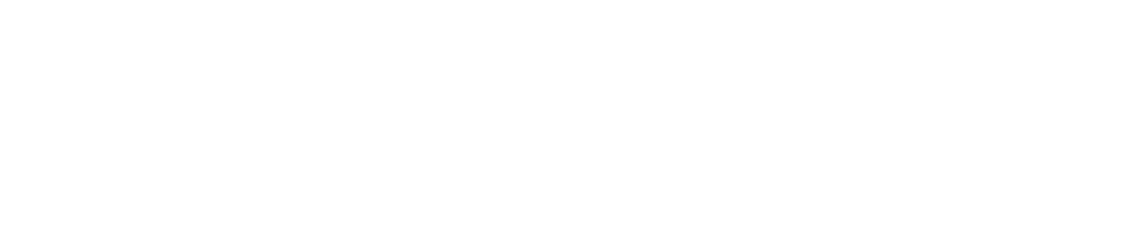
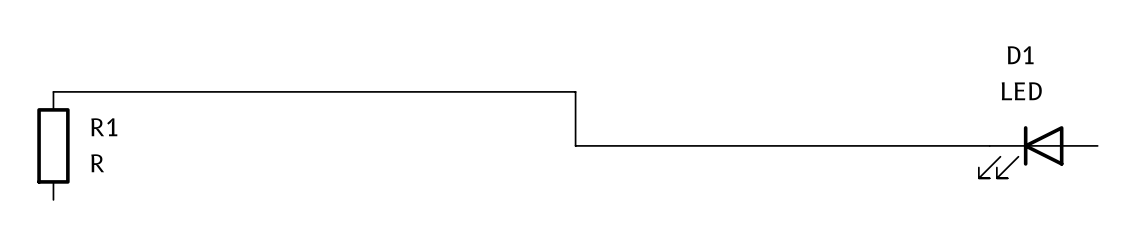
wire: none -> (53, 91) (575, 91) (575, 145) (989, 145)
R1: none -> R (53, 145)
D1: none -> LED (1038, 152)

